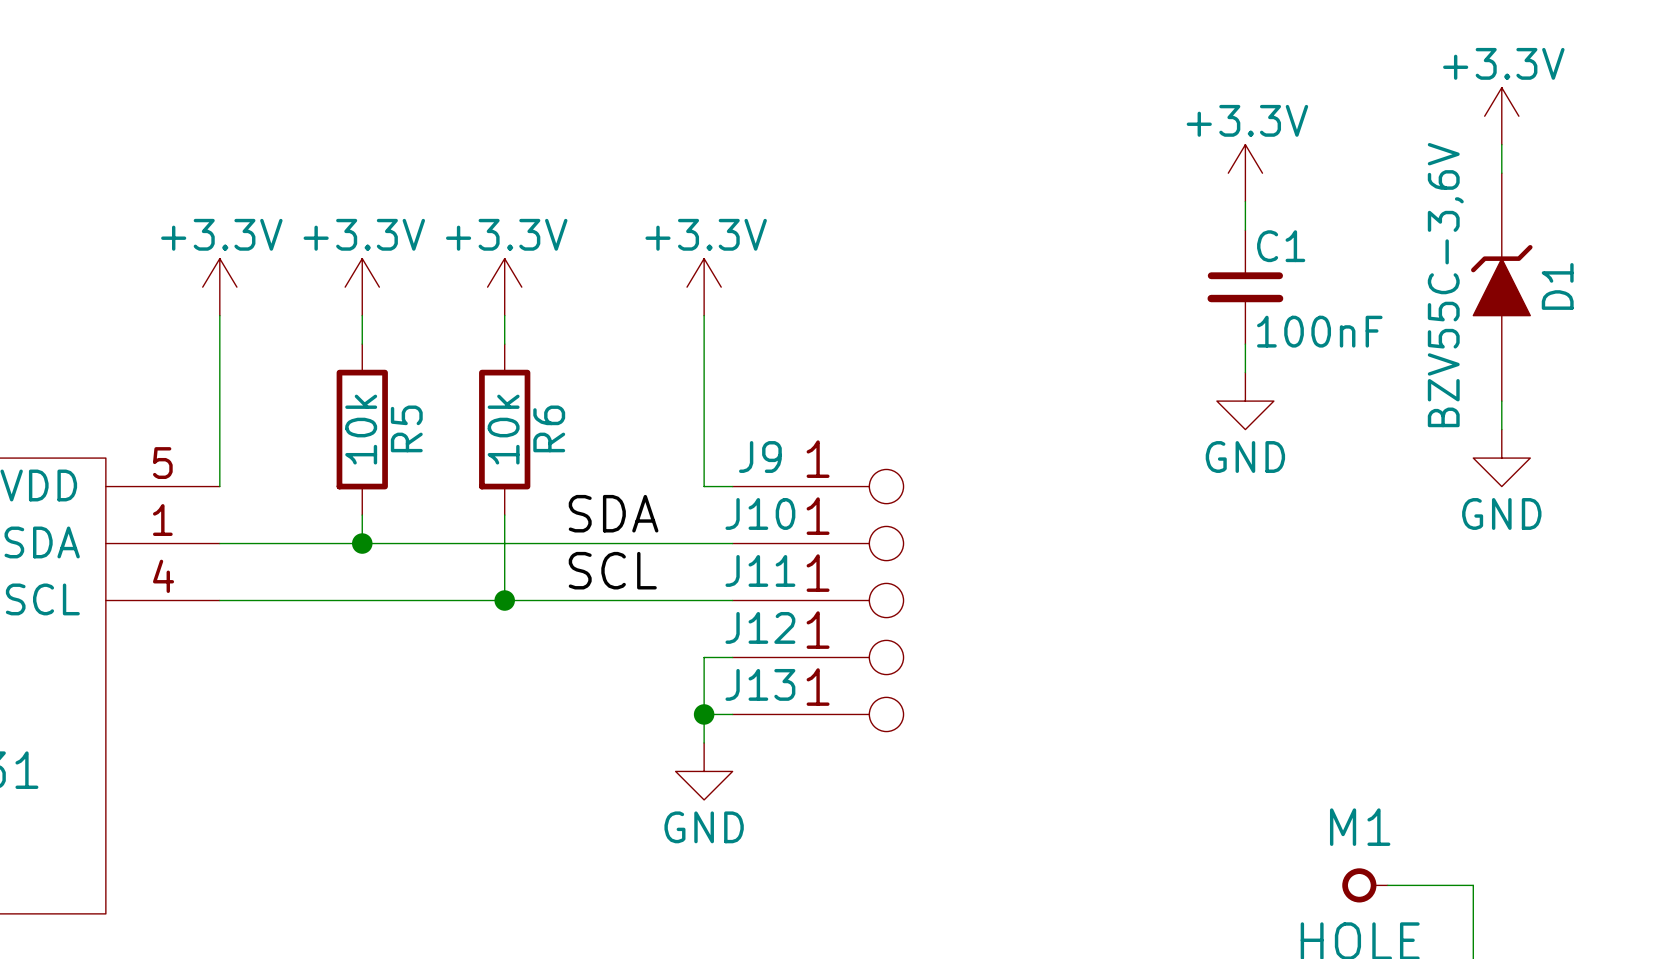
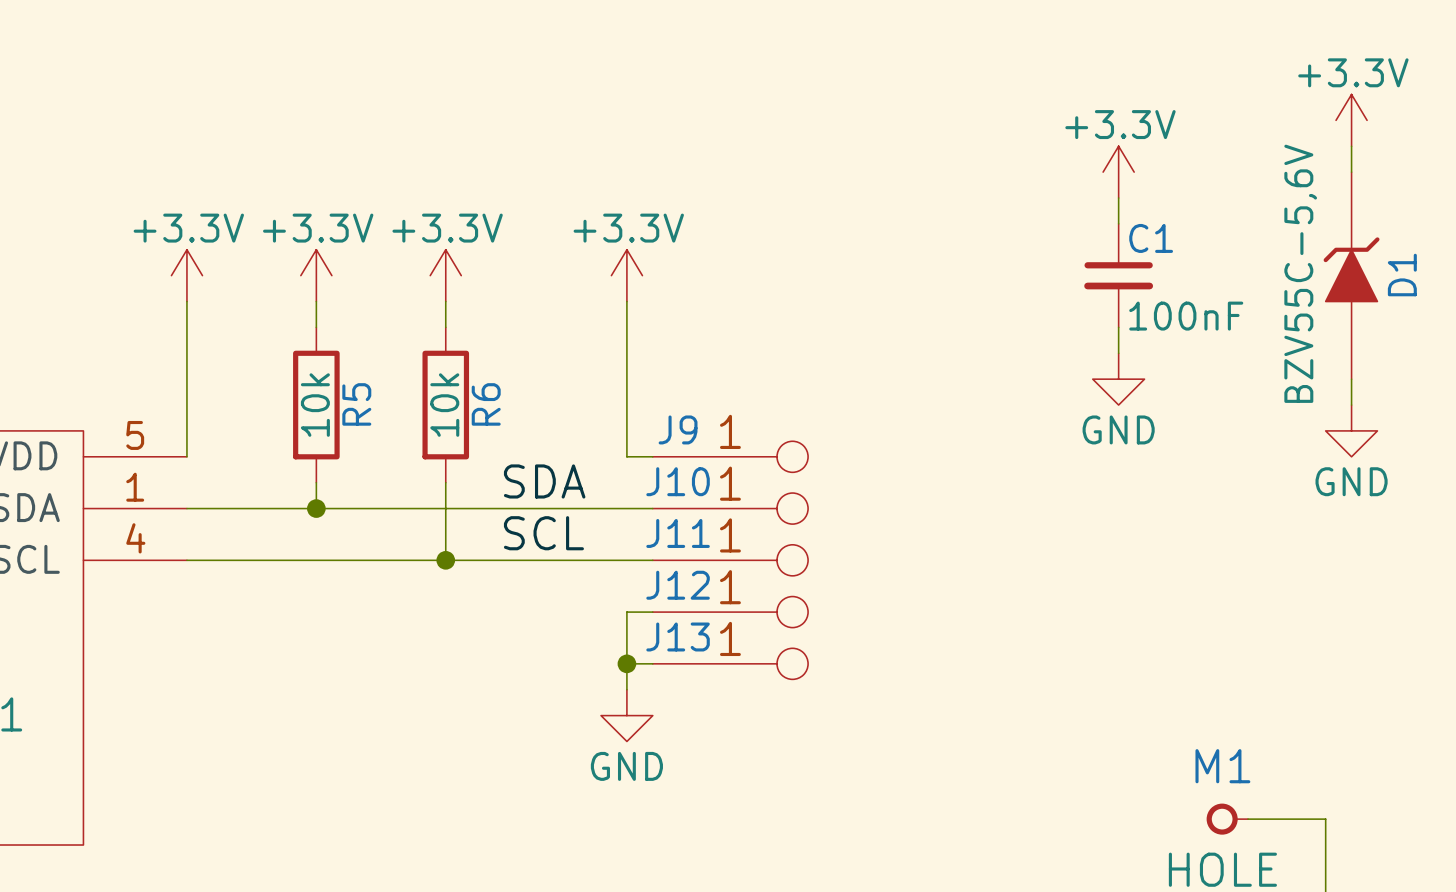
D1 value: BZV55C-3,6V (1445, 285) -> BZV55C-5,6V (1300, 273)

